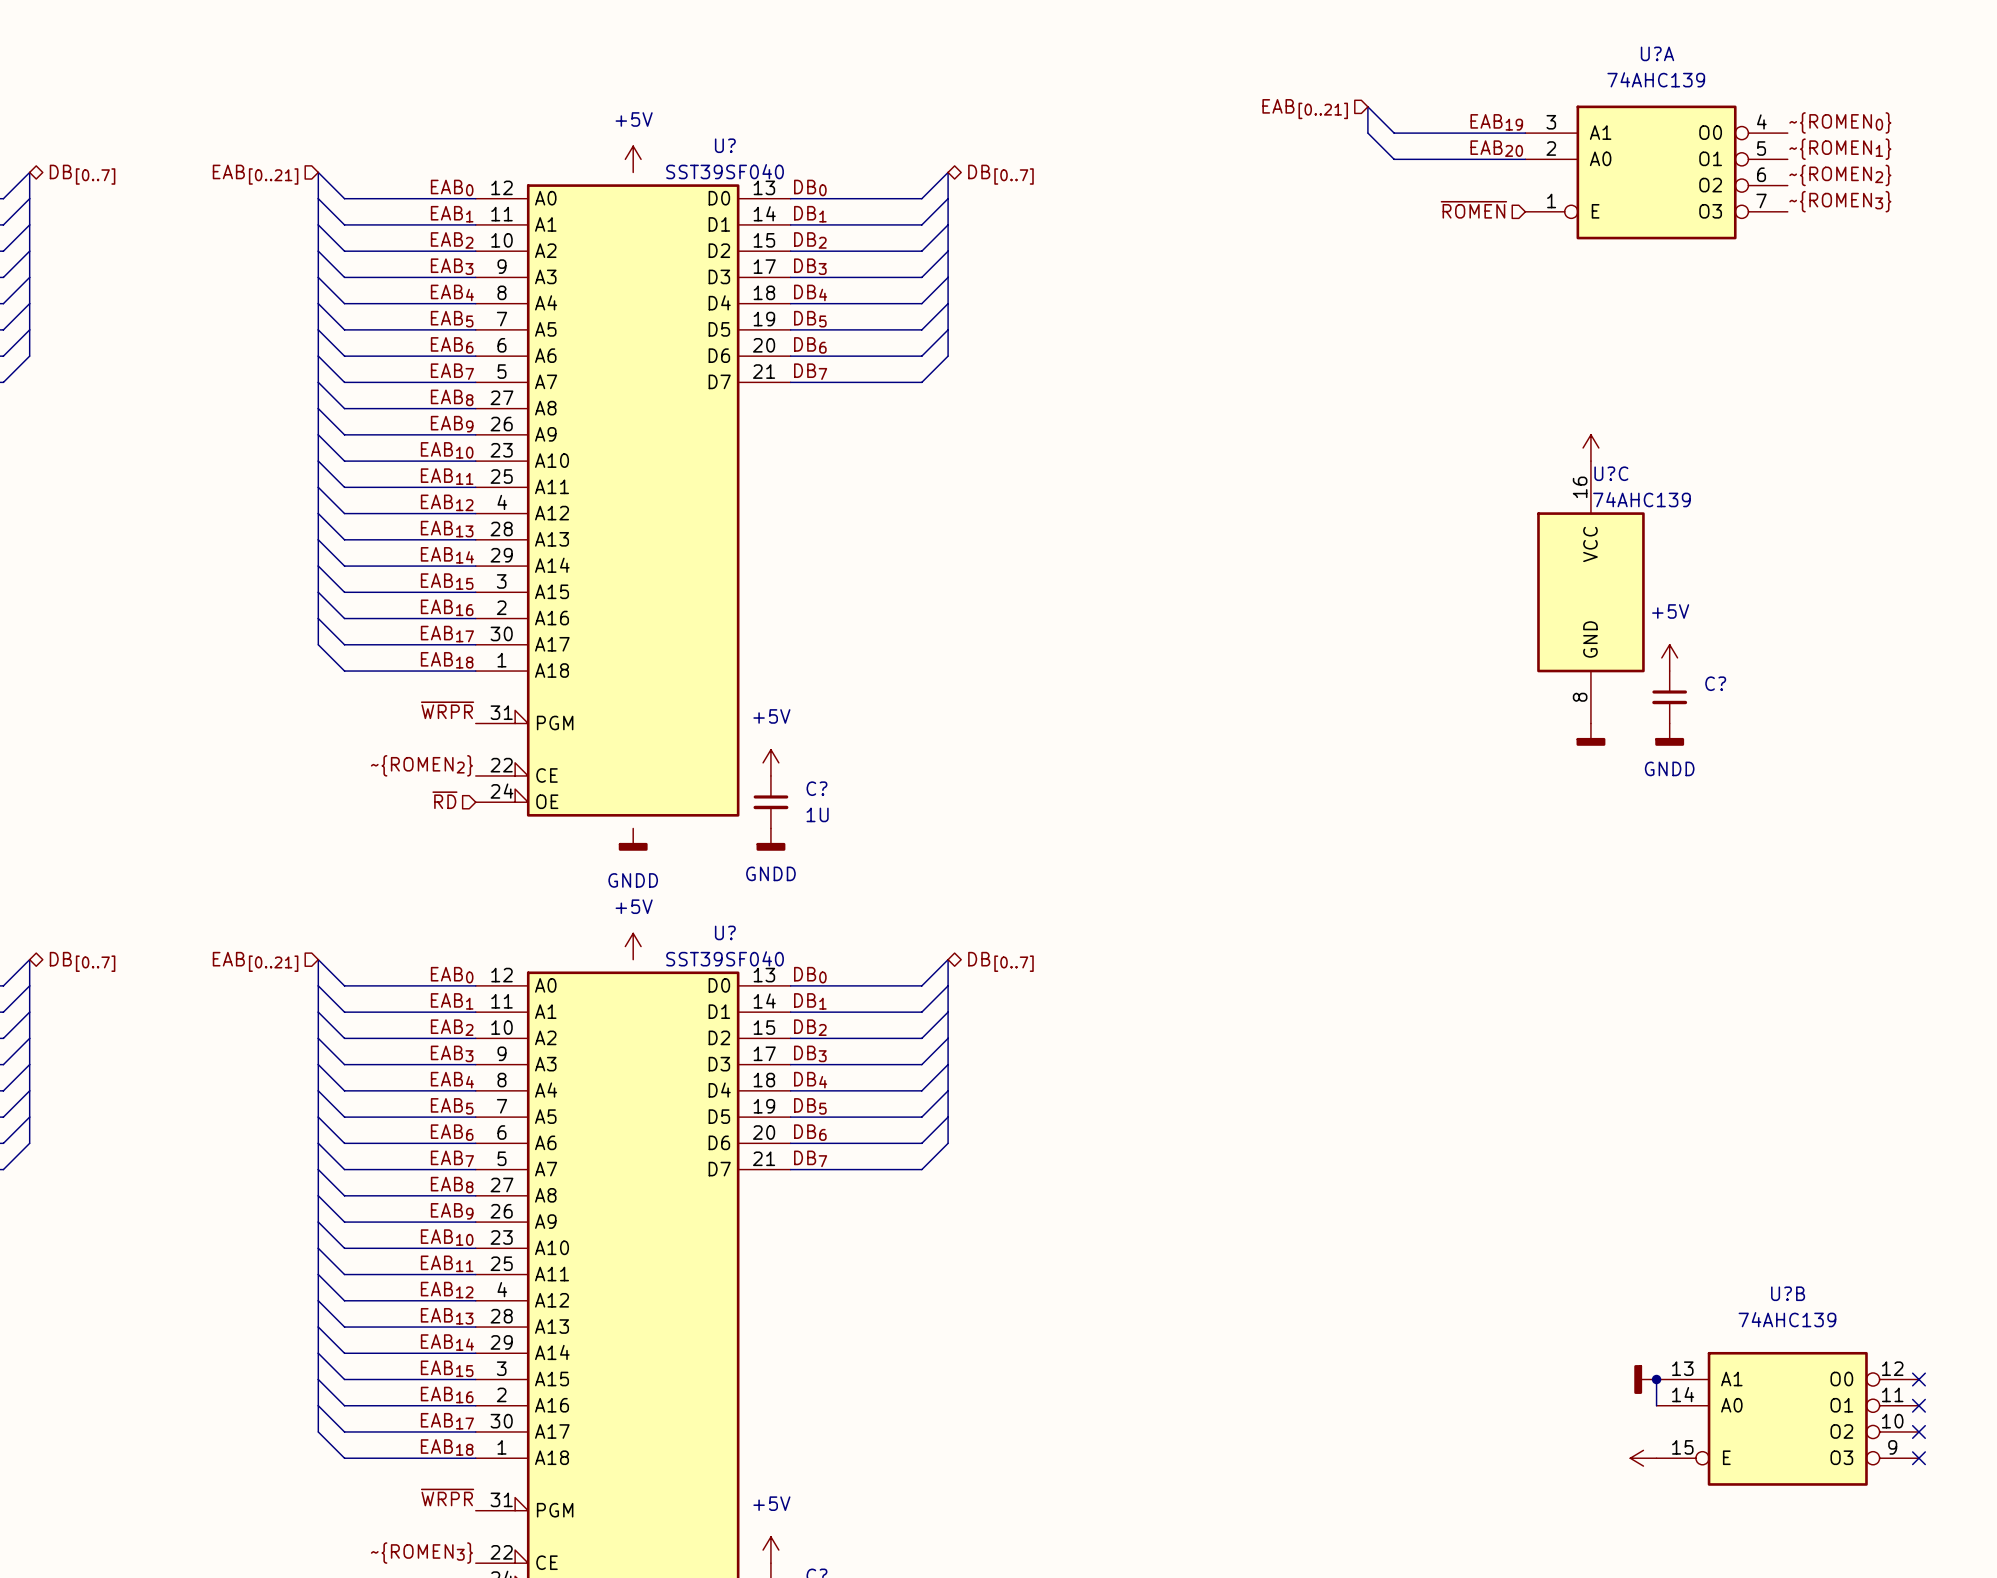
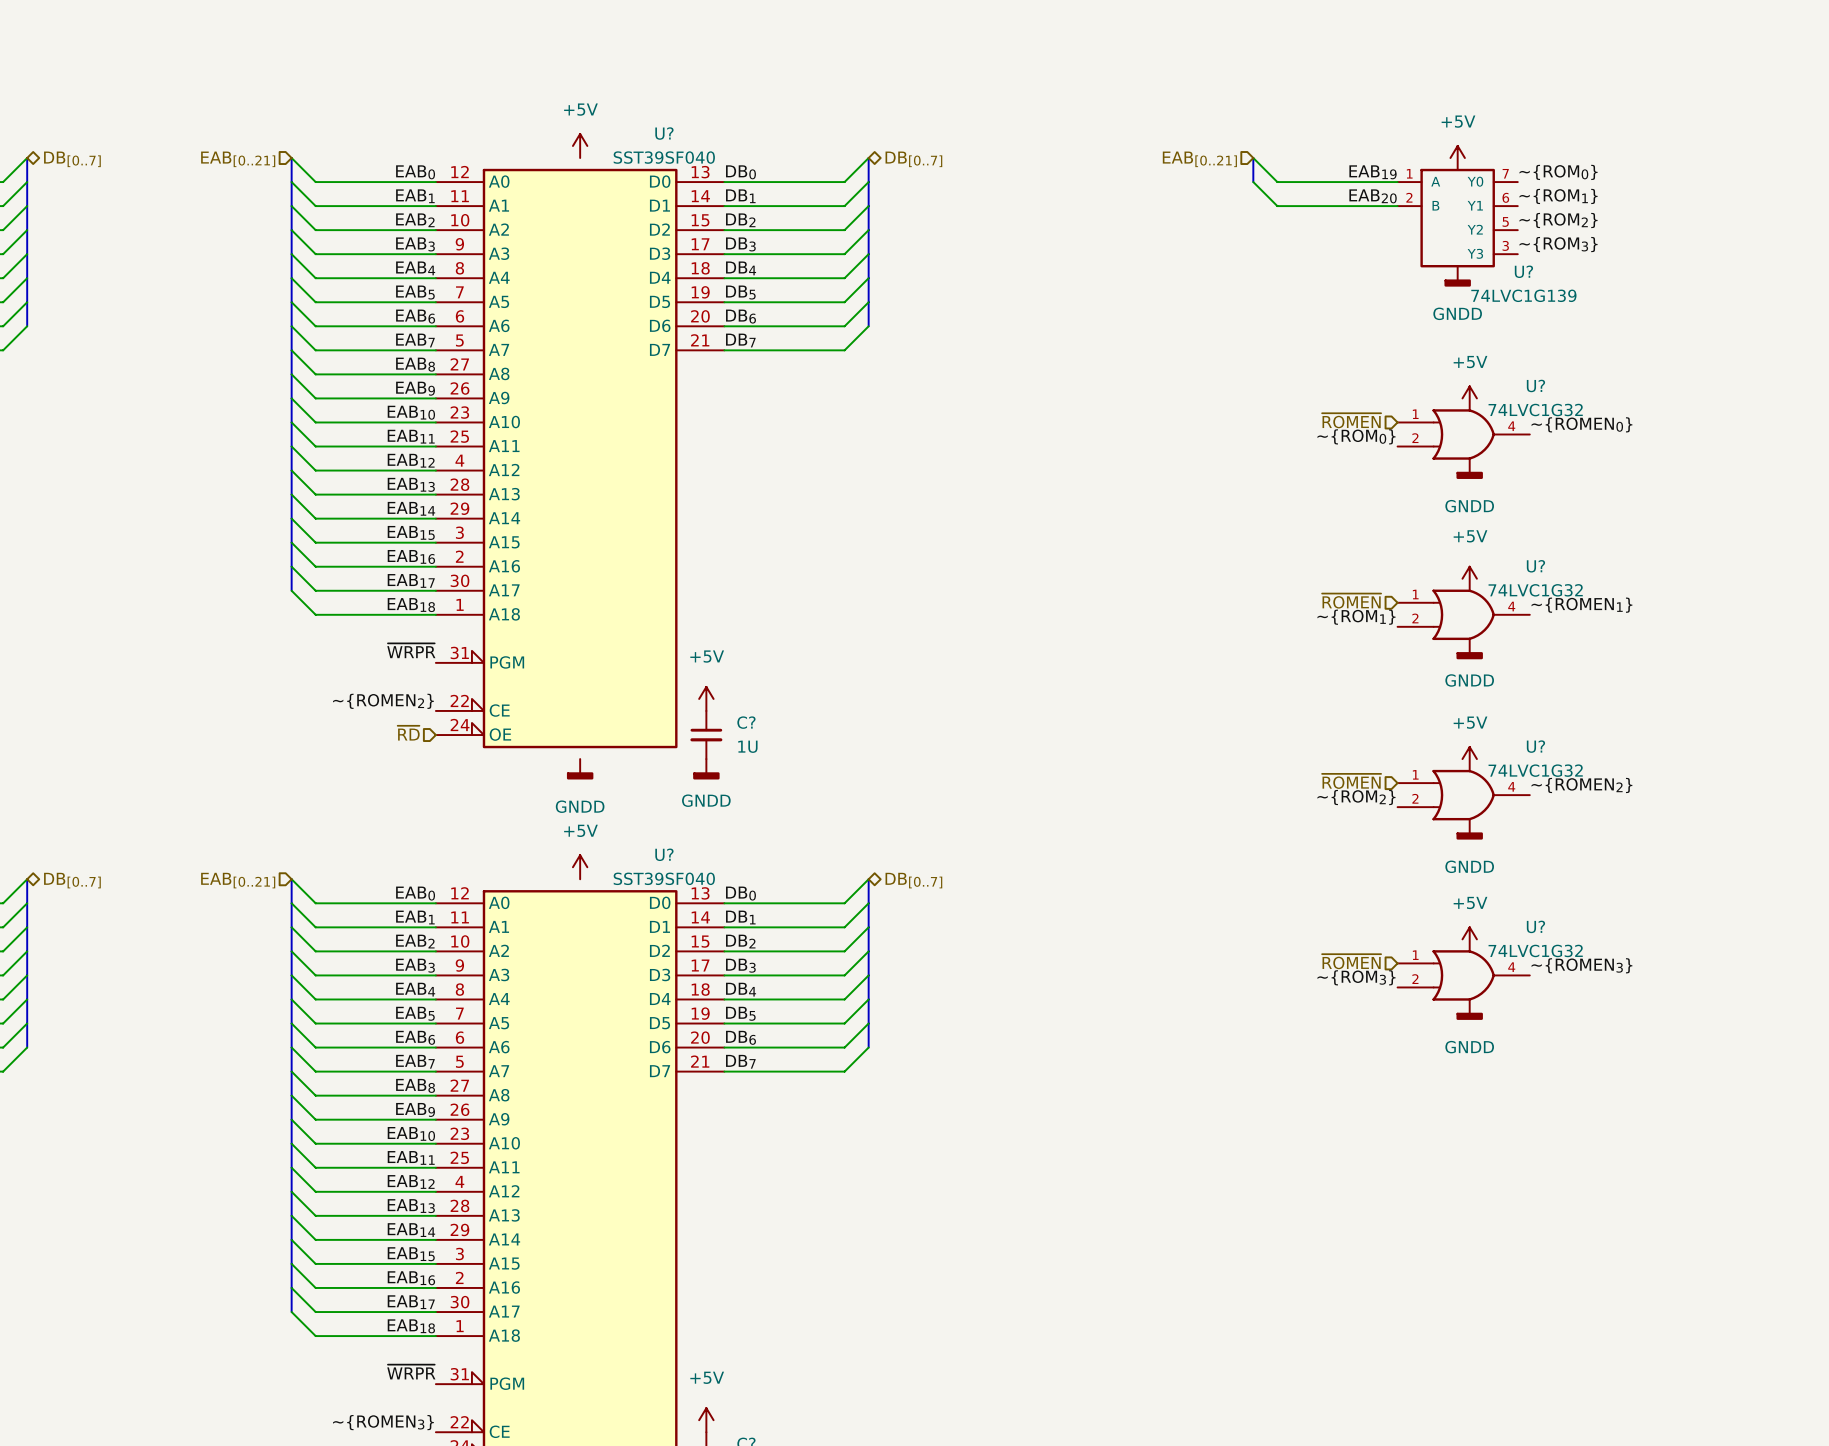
wire: (1367, 106) (1394, 133) (1525, 133) -> (1253, 158) (1277, 182) (1397, 182)
bus: (1367, 106) (1367, 133) -> (1253, 158) (1253, 182)
hierarchical label position: EAB[0..21] (1305, 109) -> EAB[0..21] (1199, 159)
label position: EAB19 (1496, 122) -> EAB19 (1373, 172)
label: ~{ROMEN0} (1840, 122) -> none
wire: (1367, 133) (1394, 159) (1525, 159) -> (1253, 182) (1277, 206) (1397, 206)
label position: EAB20 (1496, 148) -> EAB20 (1373, 196)
label: ~{ROMEN1} (1840, 149) -> none
power symbol: none -> +5V (1457, 158)
U?A: 74AHC139 (1656, 172) -> none
label: ~{ROMEN2} (1840, 175) -> none
label: none -> ~{ROM0} (1558, 172)
label: ~{ROMEN3} (1840, 201) -> none
hierarchical label: ~{ROMEN} (1473, 209) -> none
label: none -> ~{ROM1} (1558, 196)
U?: none -> 74LVC1G139 (1457, 218)
label: none -> ~{ROM2} (1558, 220)
label: none -> ~{ROM3} (1558, 244)
power symbol: none -> GNDD (1457, 276)
power symbol: none -> +5V (1469, 398)
power symbol: (1590, 447) -> none
hierarchical label: none -> ~{ROMEN} (1351, 420)
label: none -> ~{ROMEN0} (1581, 424)
U?: none -> 74LVC1G32 (1463, 434)
label: none -> ~{ROM0} (1356, 436)
power symbol: none -> GNDD (1469, 468)
U?C: 74AHC139 (1590, 592) -> none
hierarchical label: none -> ~{ROMEN} (1351, 601)
power symbol position: +5V (1669, 657) -> +5V (1469, 578)
label: none -> ~{ROMEN1} (1581, 605)
U?: none -> 74LVC1G32 (1463, 614)
label: none -> ~{ROM1} (1356, 617)
C?: (1669, 697) -> none
power symbol: (1590, 734) -> none
power symbol position: GNDD (1669, 734) -> GNDD (1469, 649)
power symbol: none -> +5V (1469, 759)
hierarchical label: none -> ~{ROMEN} (1351, 781)
label: none -> ~{ROMEN2} (1581, 785)
U?: none -> 74LVC1G32 (1463, 795)
label: none -> ~{ROM2} (1356, 797)
power symbol: none -> GNDD (1469, 829)
power symbol: none -> +5V (1469, 939)
hierarchical label: none -> ~{ROMEN} (1351, 961)
label: none -> ~{ROMEN3} (1581, 965)
U?: none -> 74LVC1G32 (1463, 975)
label: none -> ~{ROM3} (1356, 977)
power symbol: none -> GNDD (1469, 1009)
power symbol: (1645, 1379) -> none
wire: (1656, 1379) (1656, 1405) -> none
junction: (1656, 1379) -> none
no-connect mark: (1918, 1379) -> none
no-connect mark: (1918, 1405) -> none
U?B: 74AHC139 (1787, 1418) -> none
no-connect mark: (1918, 1431) -> none
power symbol: (1643, 1458) -> none
no-connect mark: (1918, 1458) -> none

